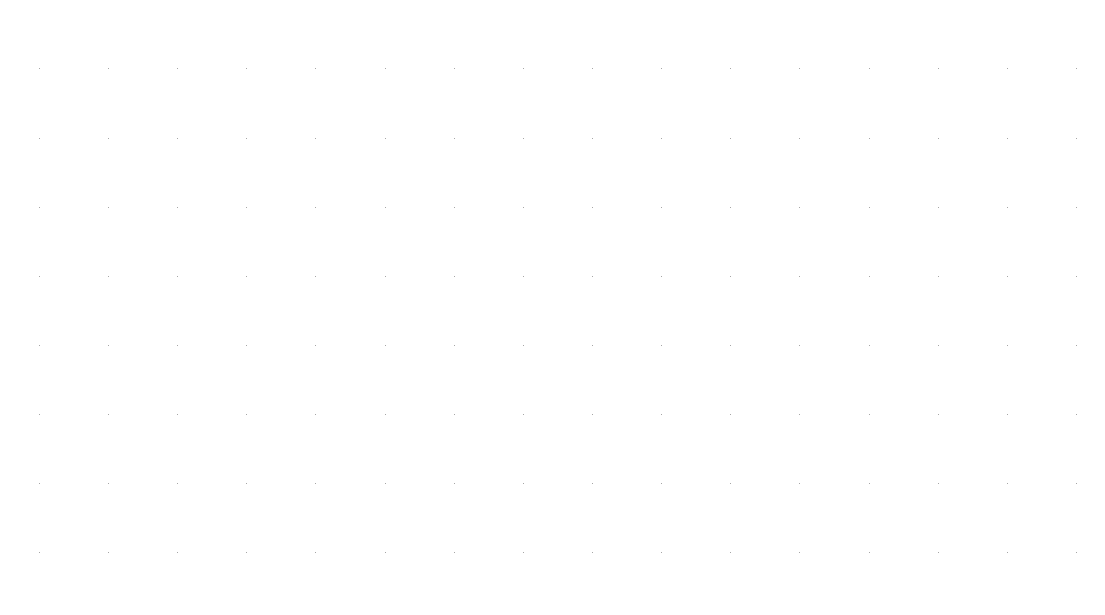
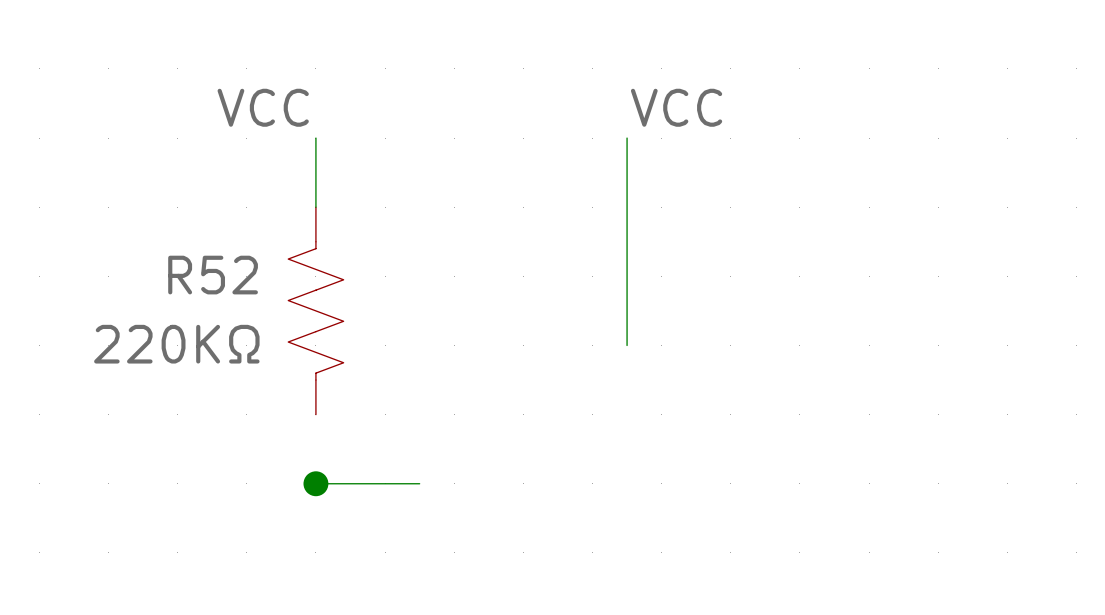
label: none -> VCC (263, 107)
label: none -> VCC (676, 107)
wire: none -> (315, 138) (315, 207)
wire: none -> (627, 138) (627, 345)
R52: none -> 220KΩ (315, 310)
wire: none -> (315, 483) (419, 483)
junction: none -> (315, 483)

